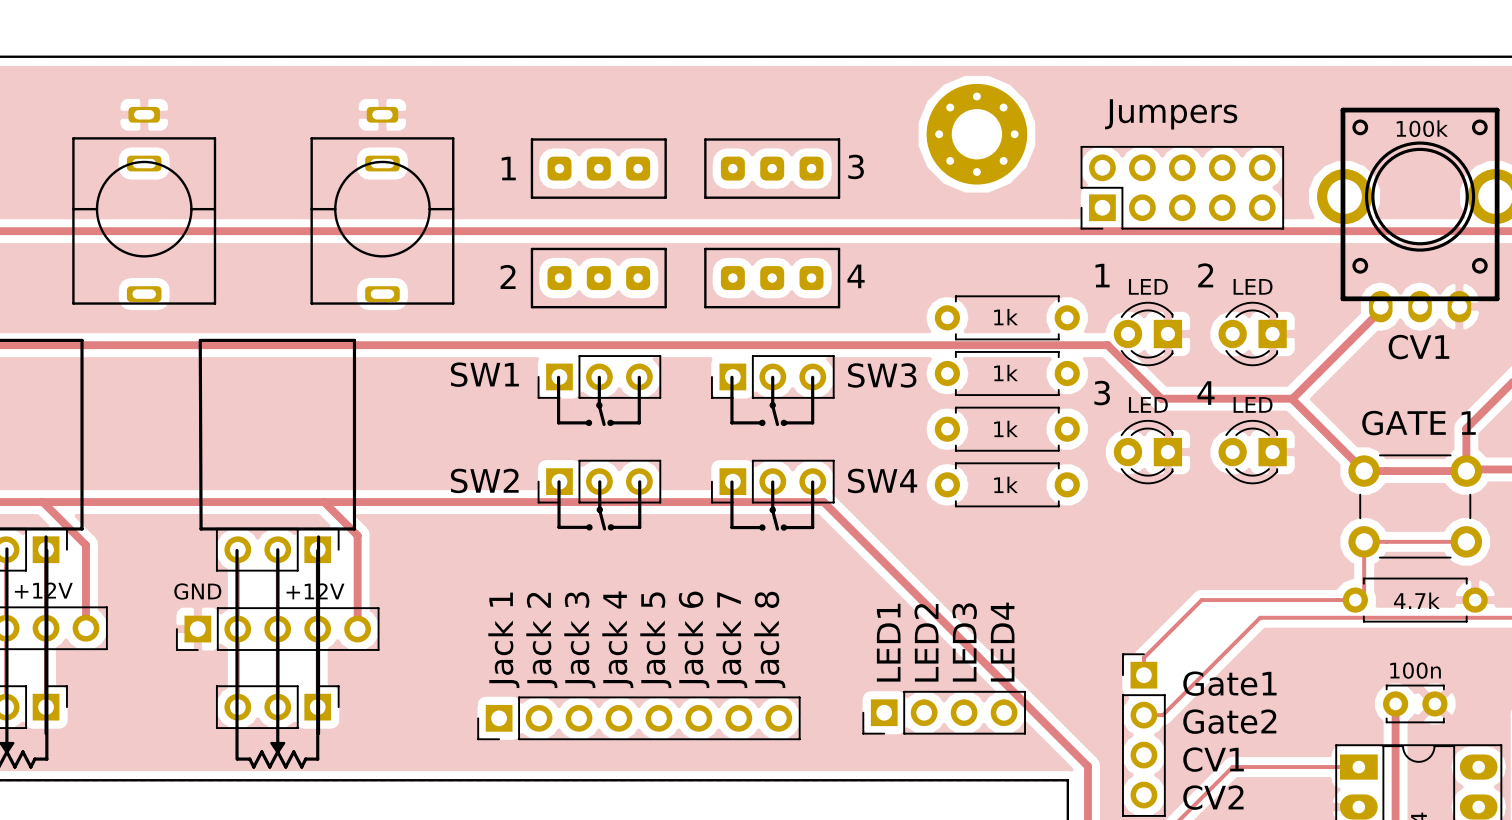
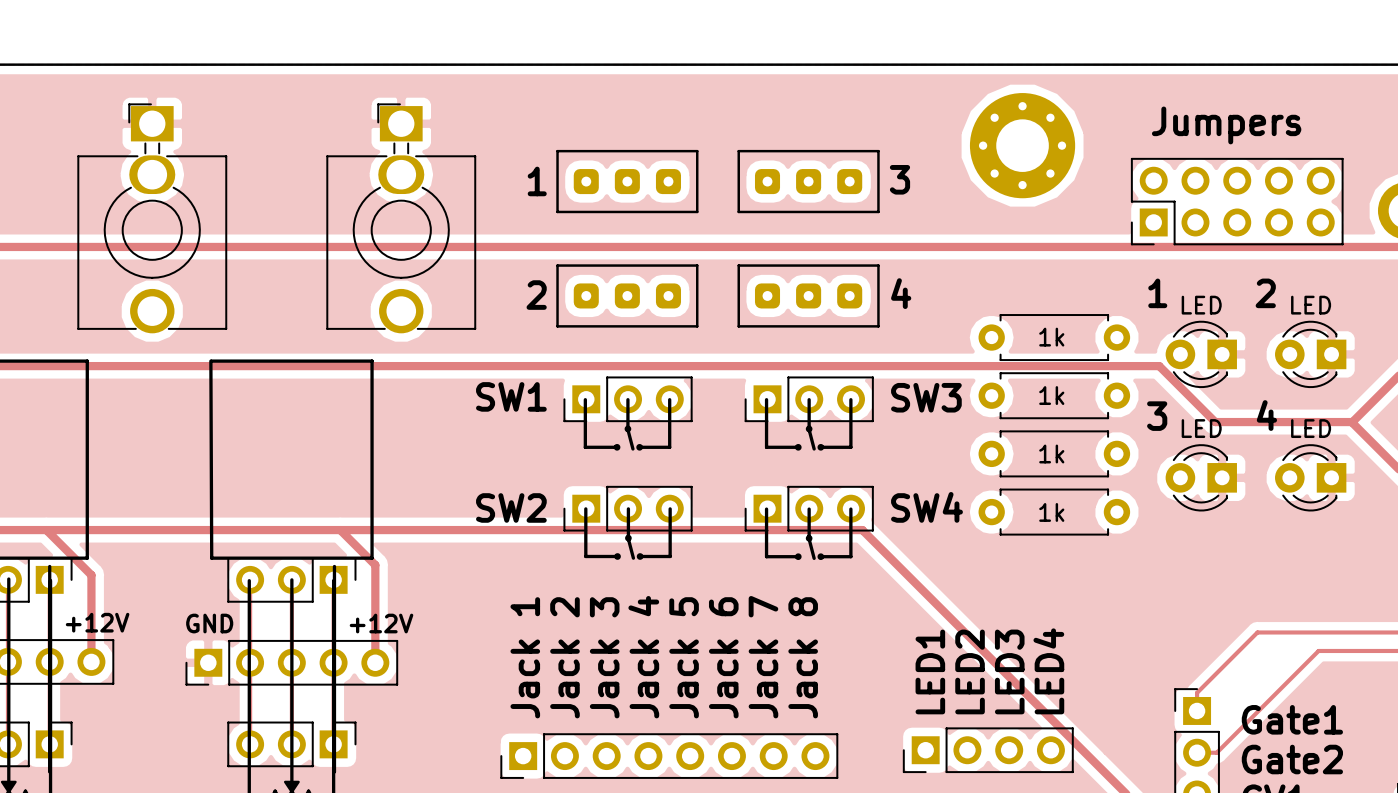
part footprint: [72, 106, 217, 305] -> [77, 103, 228, 334]
part footprint: [310, 106, 455, 305] -> [326, 103, 477, 334]

